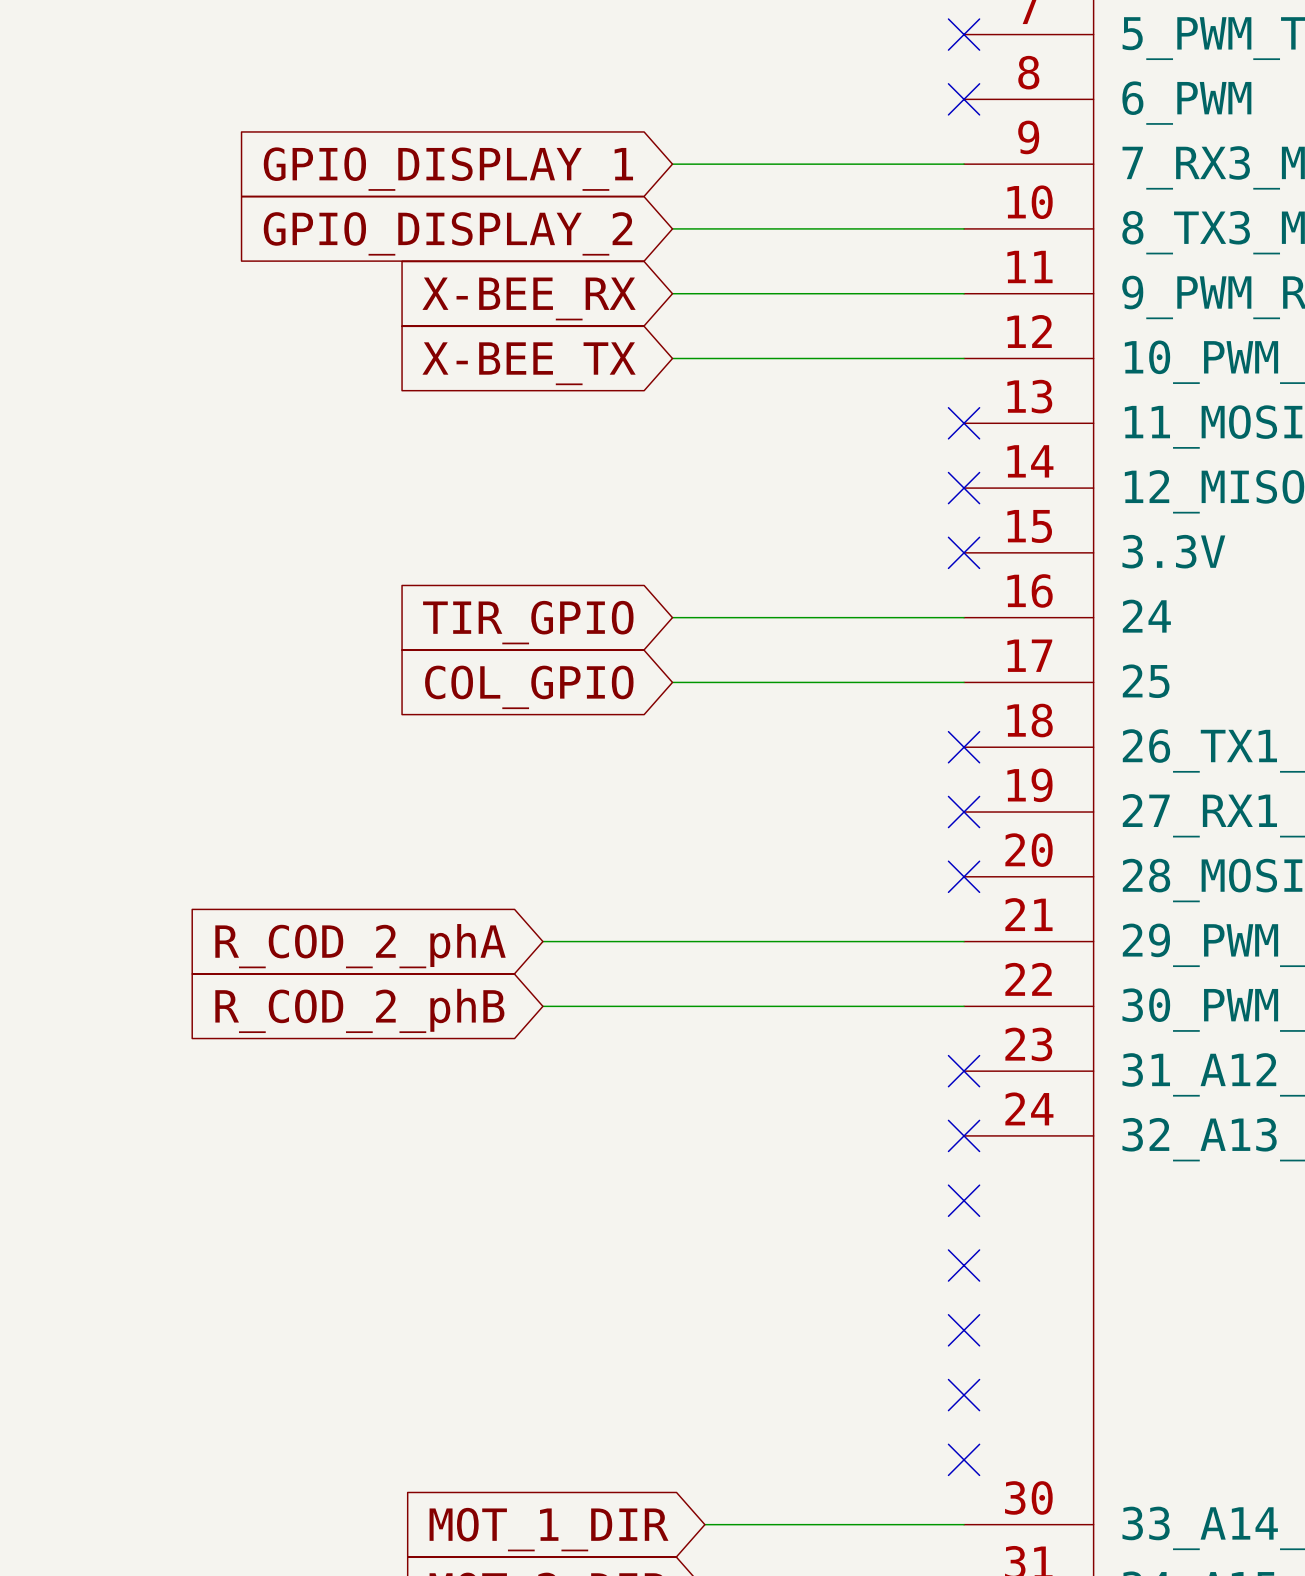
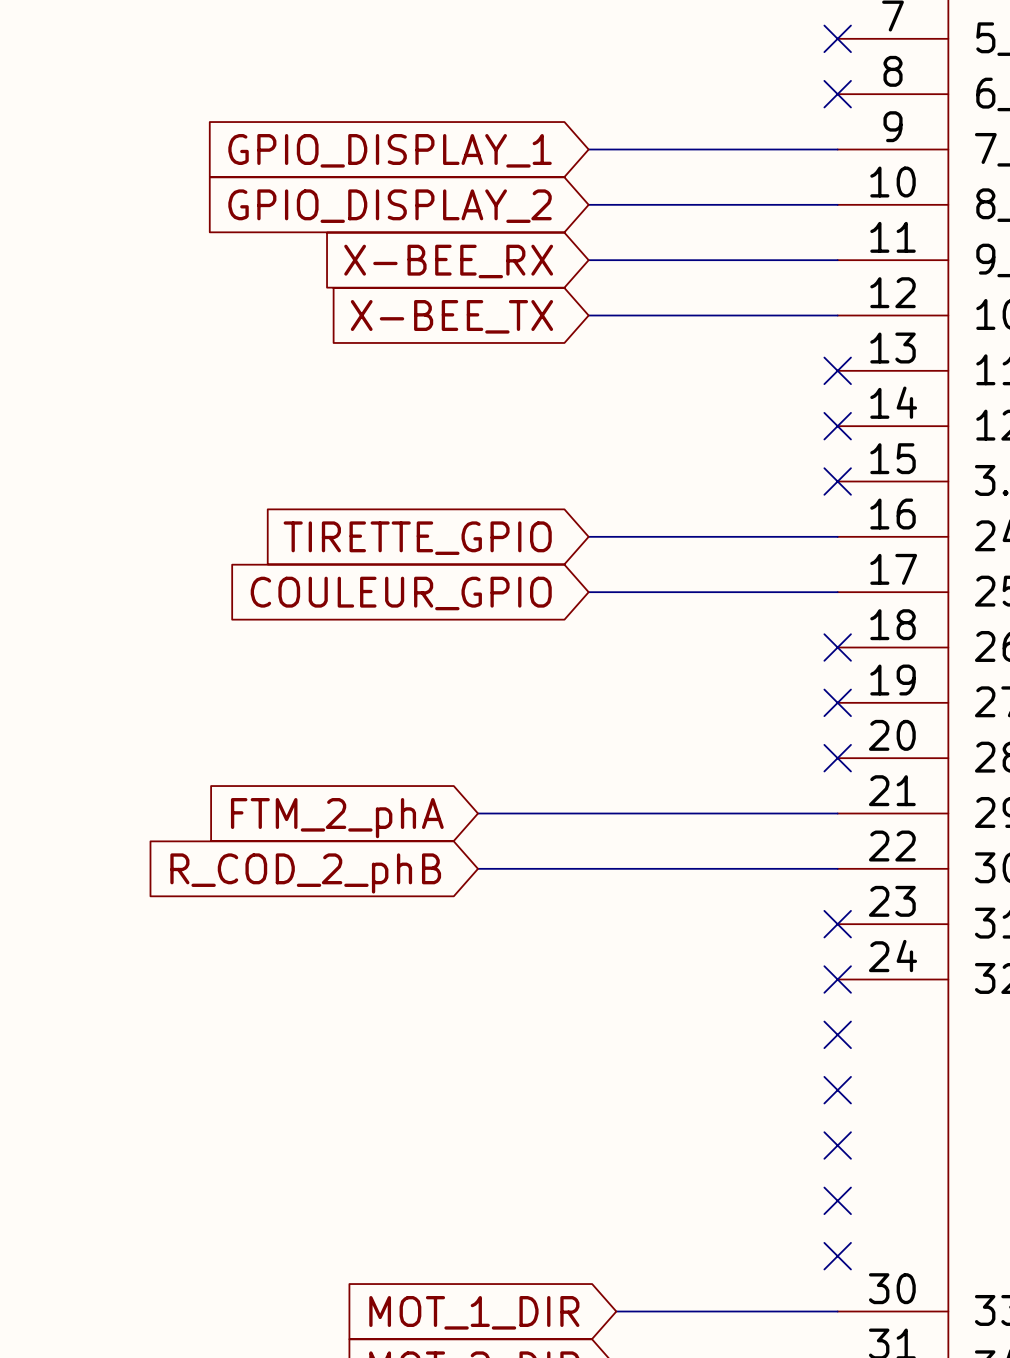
global label: TIR_GPIO (528, 622) -> TIRETTE_GPIO (417, 538)
global label: COL_GPIO (529, 687) -> COULEUR_GPIO (401, 593)
global label: R_COD_2_phA (360, 946) -> FTM_2_phA (337, 818)

